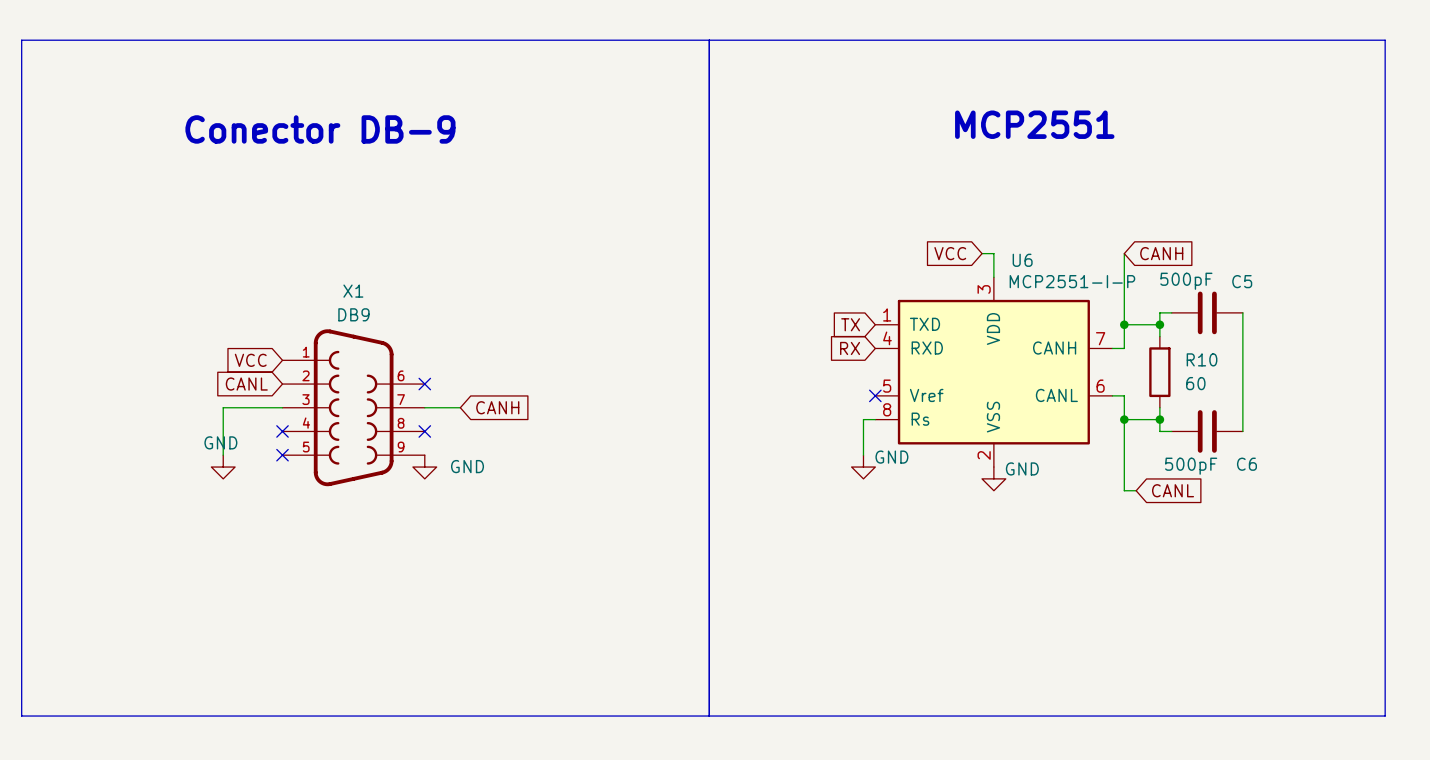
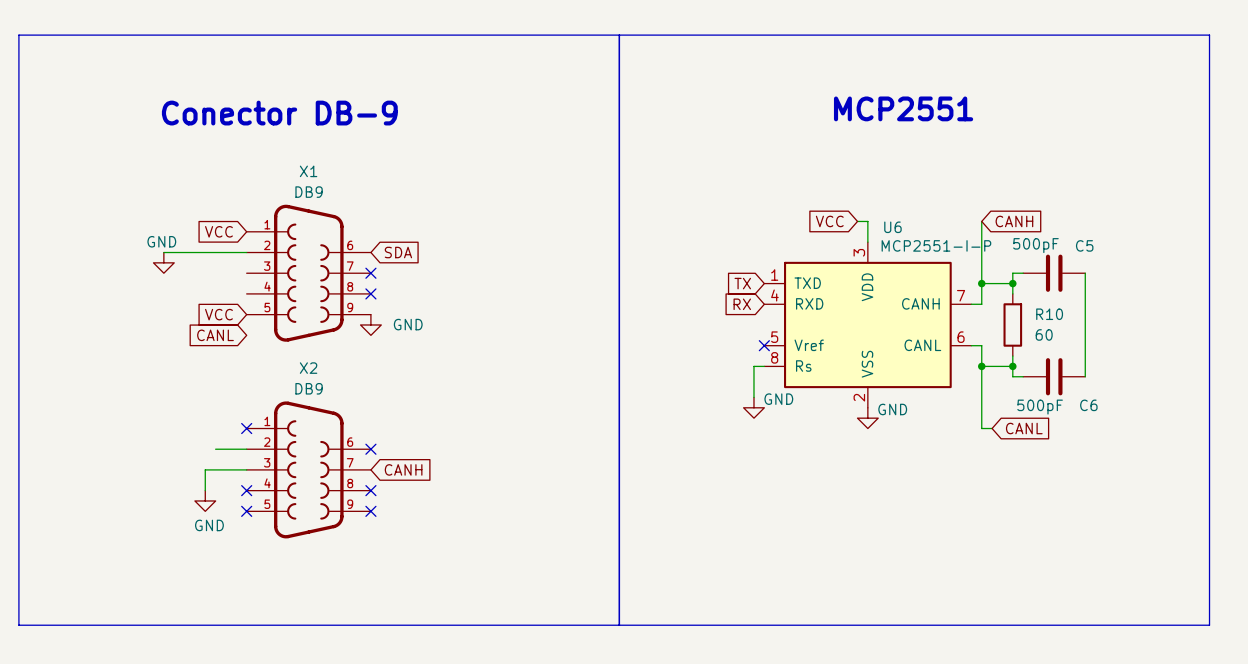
global label: none -> VCC (218, 231)
wire: none -> (163, 252) (246, 252)
global label: none -> SDA (398, 252)
power symbol: none -> GND (163, 262)
no-connect mark: none -> (370, 273)
no-connect mark: none -> (370, 293)
no-connect mark: (424, 384) -> none
wire: (282, 407) (223, 407) (223, 455) -> none
X1 position: (353, 407) -> (308, 273)
wire: (424, 407) (460, 407) -> (215, 449) (246, 449)
global label position: CANH (497, 407) -> CANH (403, 469)
no-connect mark: (282, 431) -> none
no-connect mark: (424, 431) -> none
no-connect mark: (282, 455) -> none
power symbol: GND (223, 467) -> none
power symbol position: GND (424, 467) -> GND (370, 324)
no-connect mark: none -> (246, 428)
no-connect mark: none -> (370, 449)
wire: none -> (246, 469) (205, 469) (205, 490)
X2: none -> DB9 (308, 469)
no-connect mark: none -> (246, 490)
no-connect mark: none -> (370, 490)
power symbol: none -> GND (205, 500)
no-connect mark: none -> (246, 511)
no-connect mark: none -> (370, 511)

